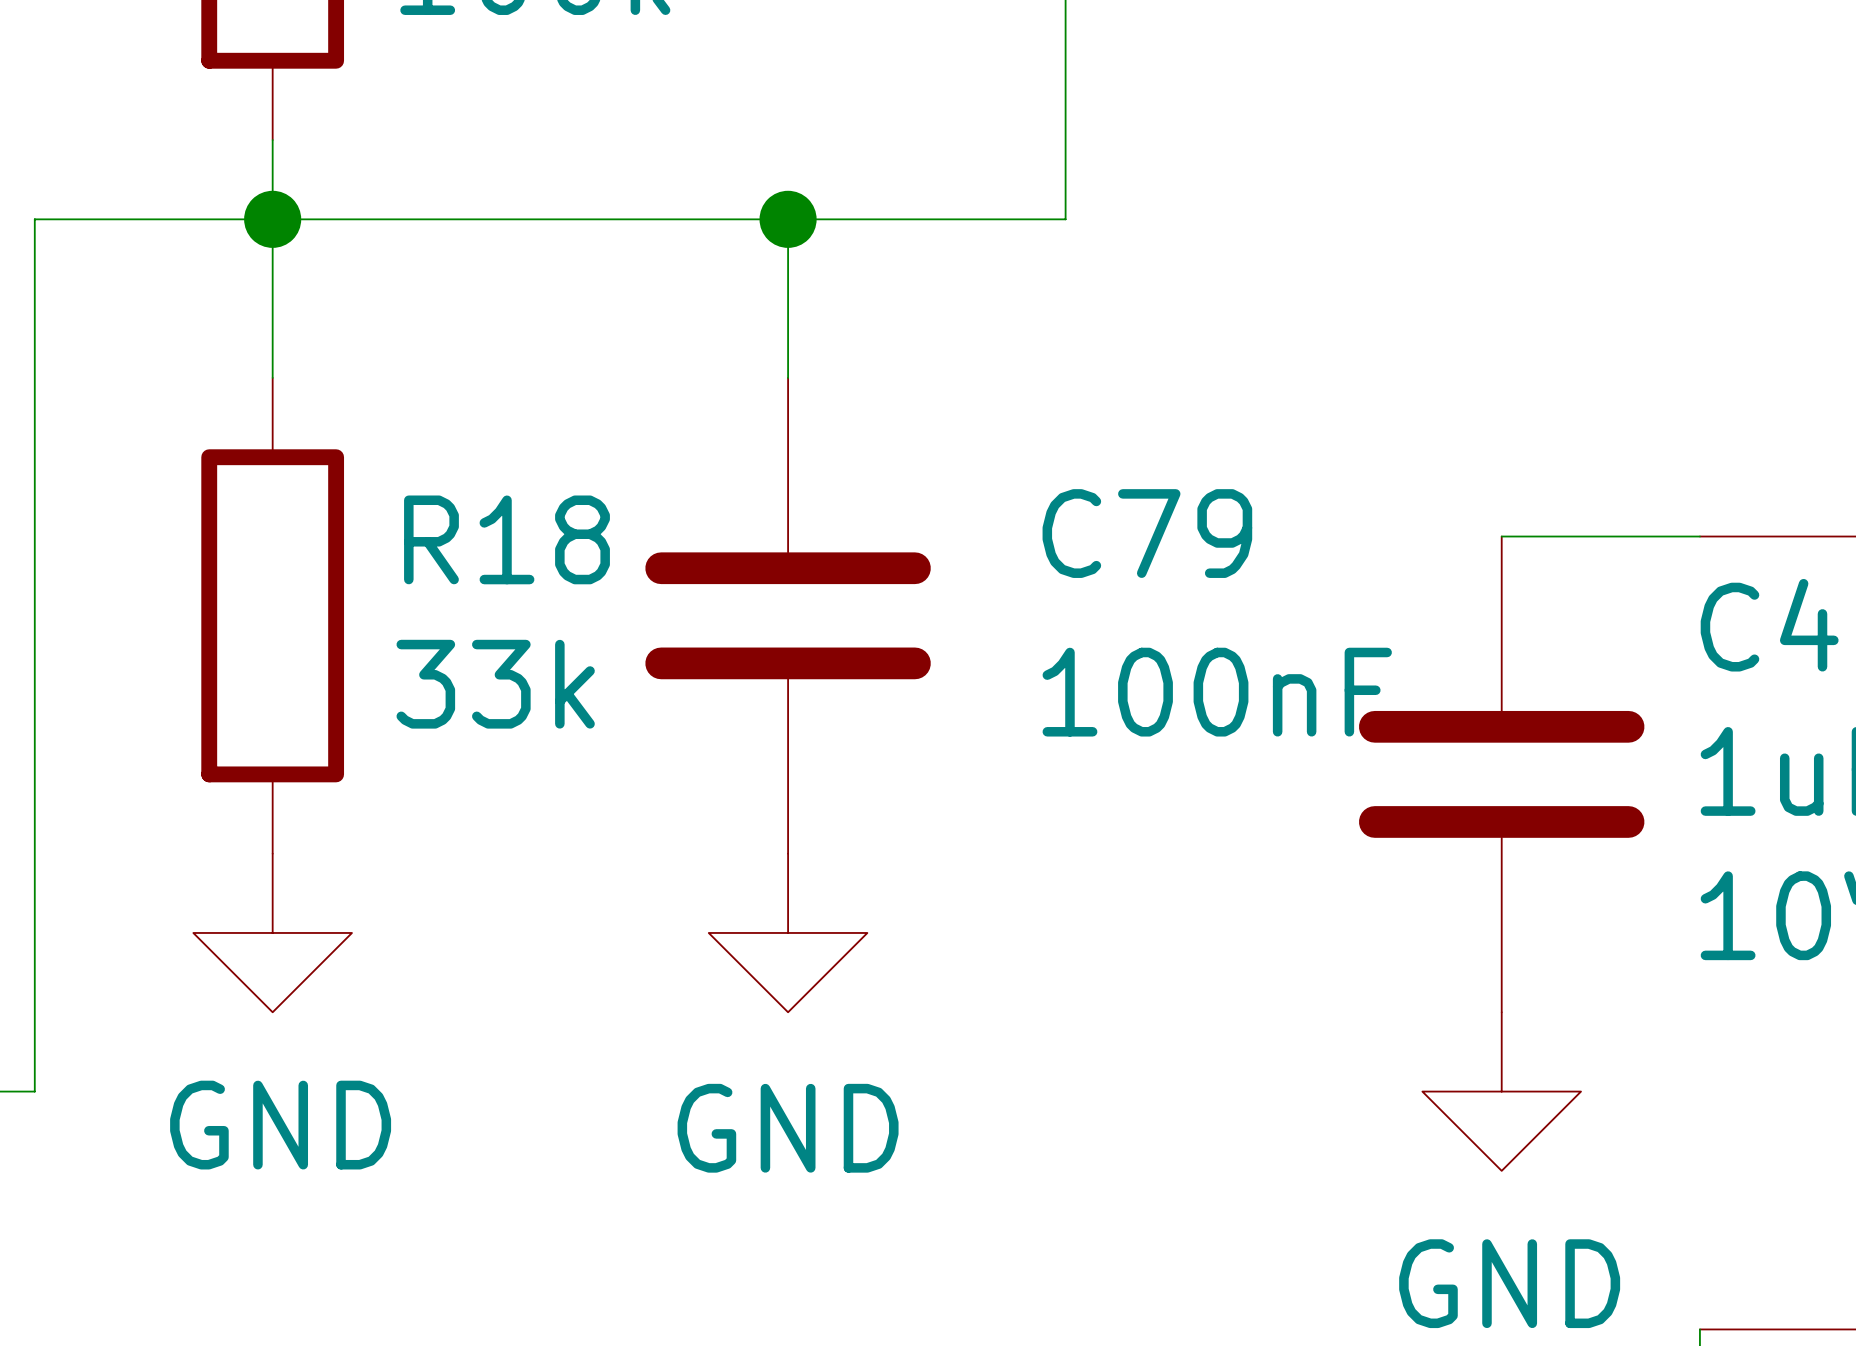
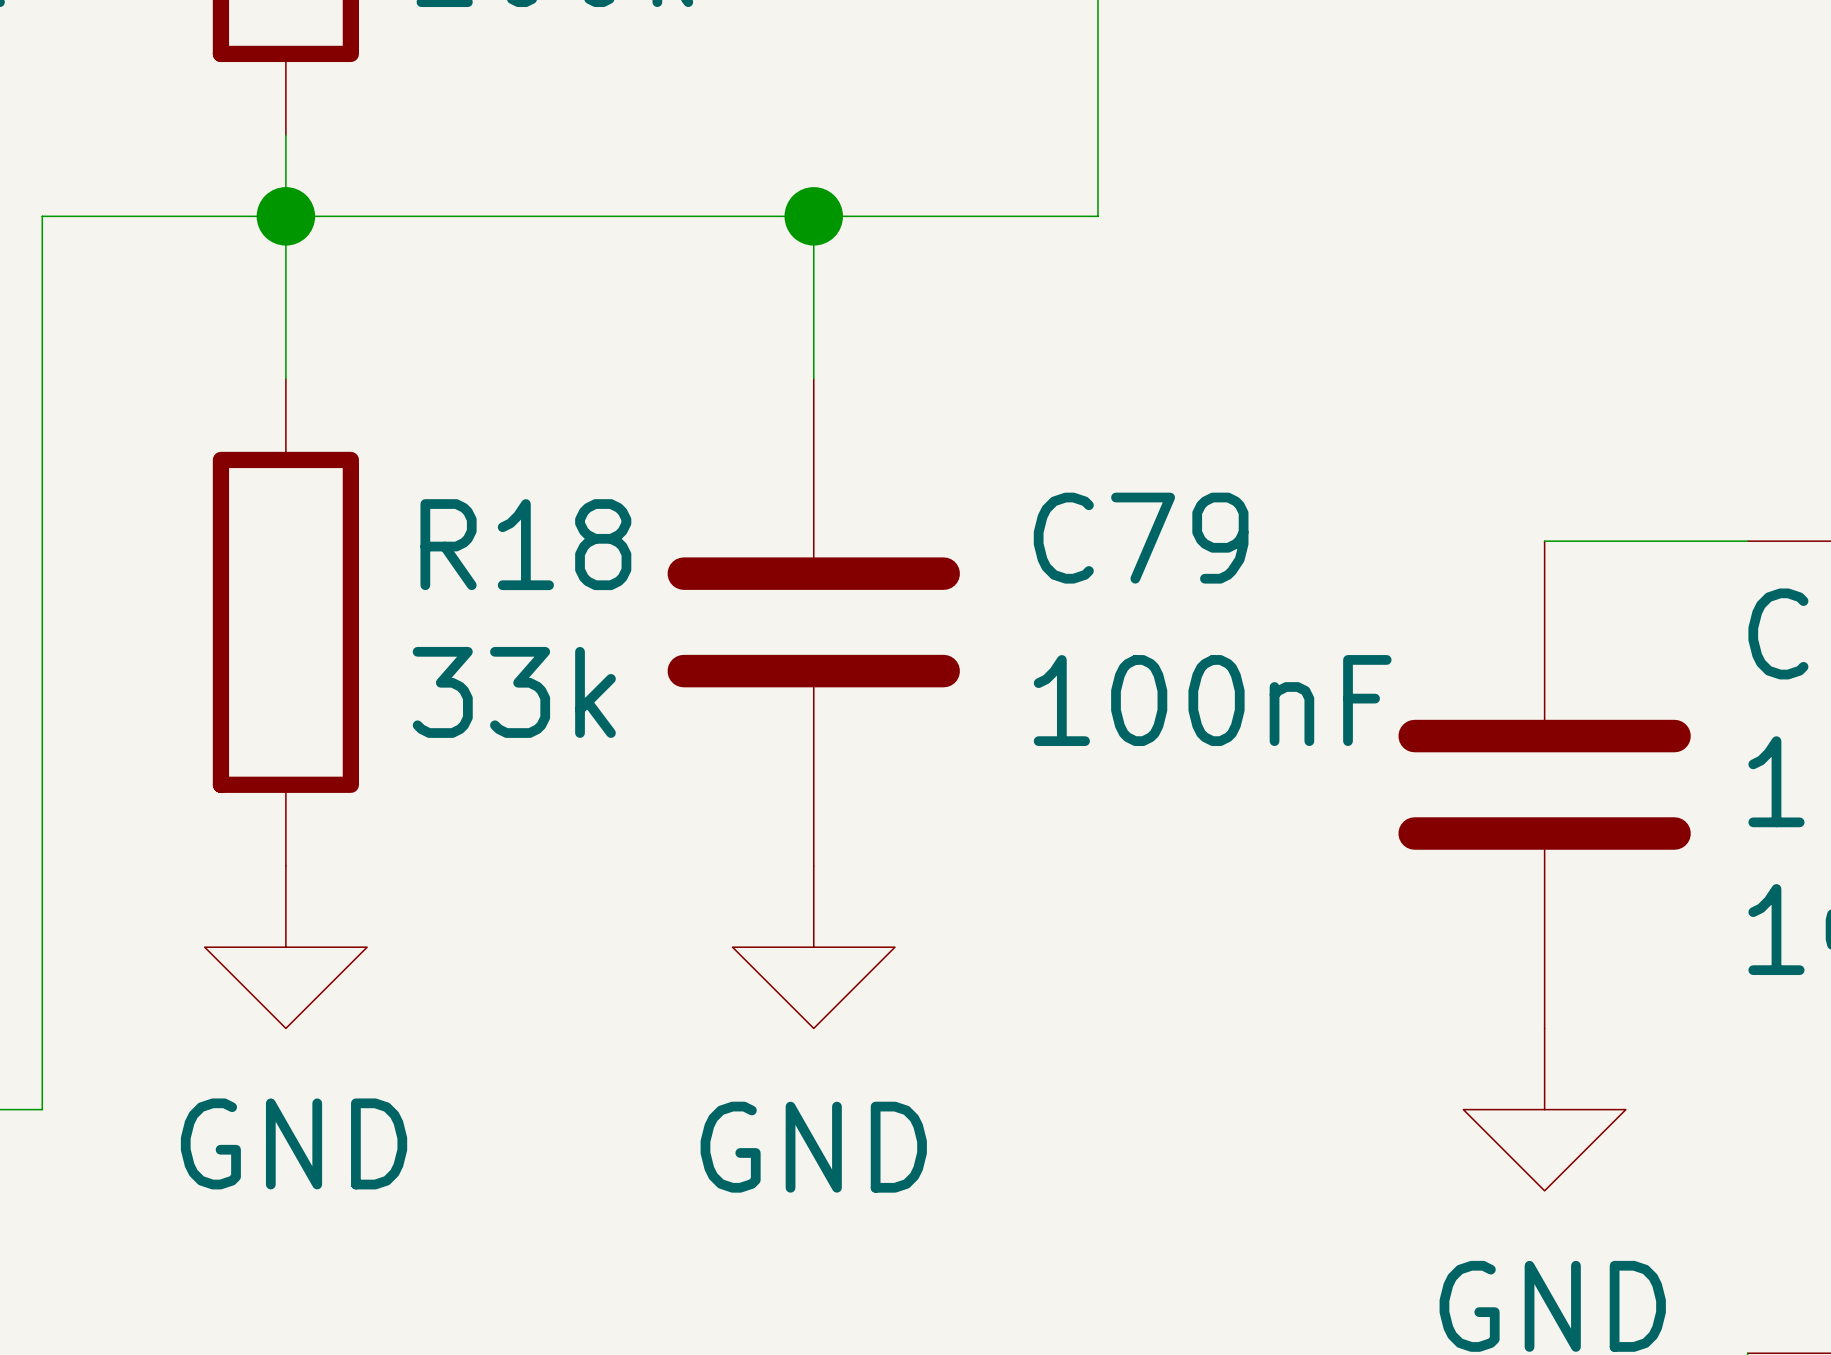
C79 name position: C79 (1147, 533) -> C79 (1141, 538)
C79 value position: 100nF (1217, 692) -> 100nF (1212, 700)

